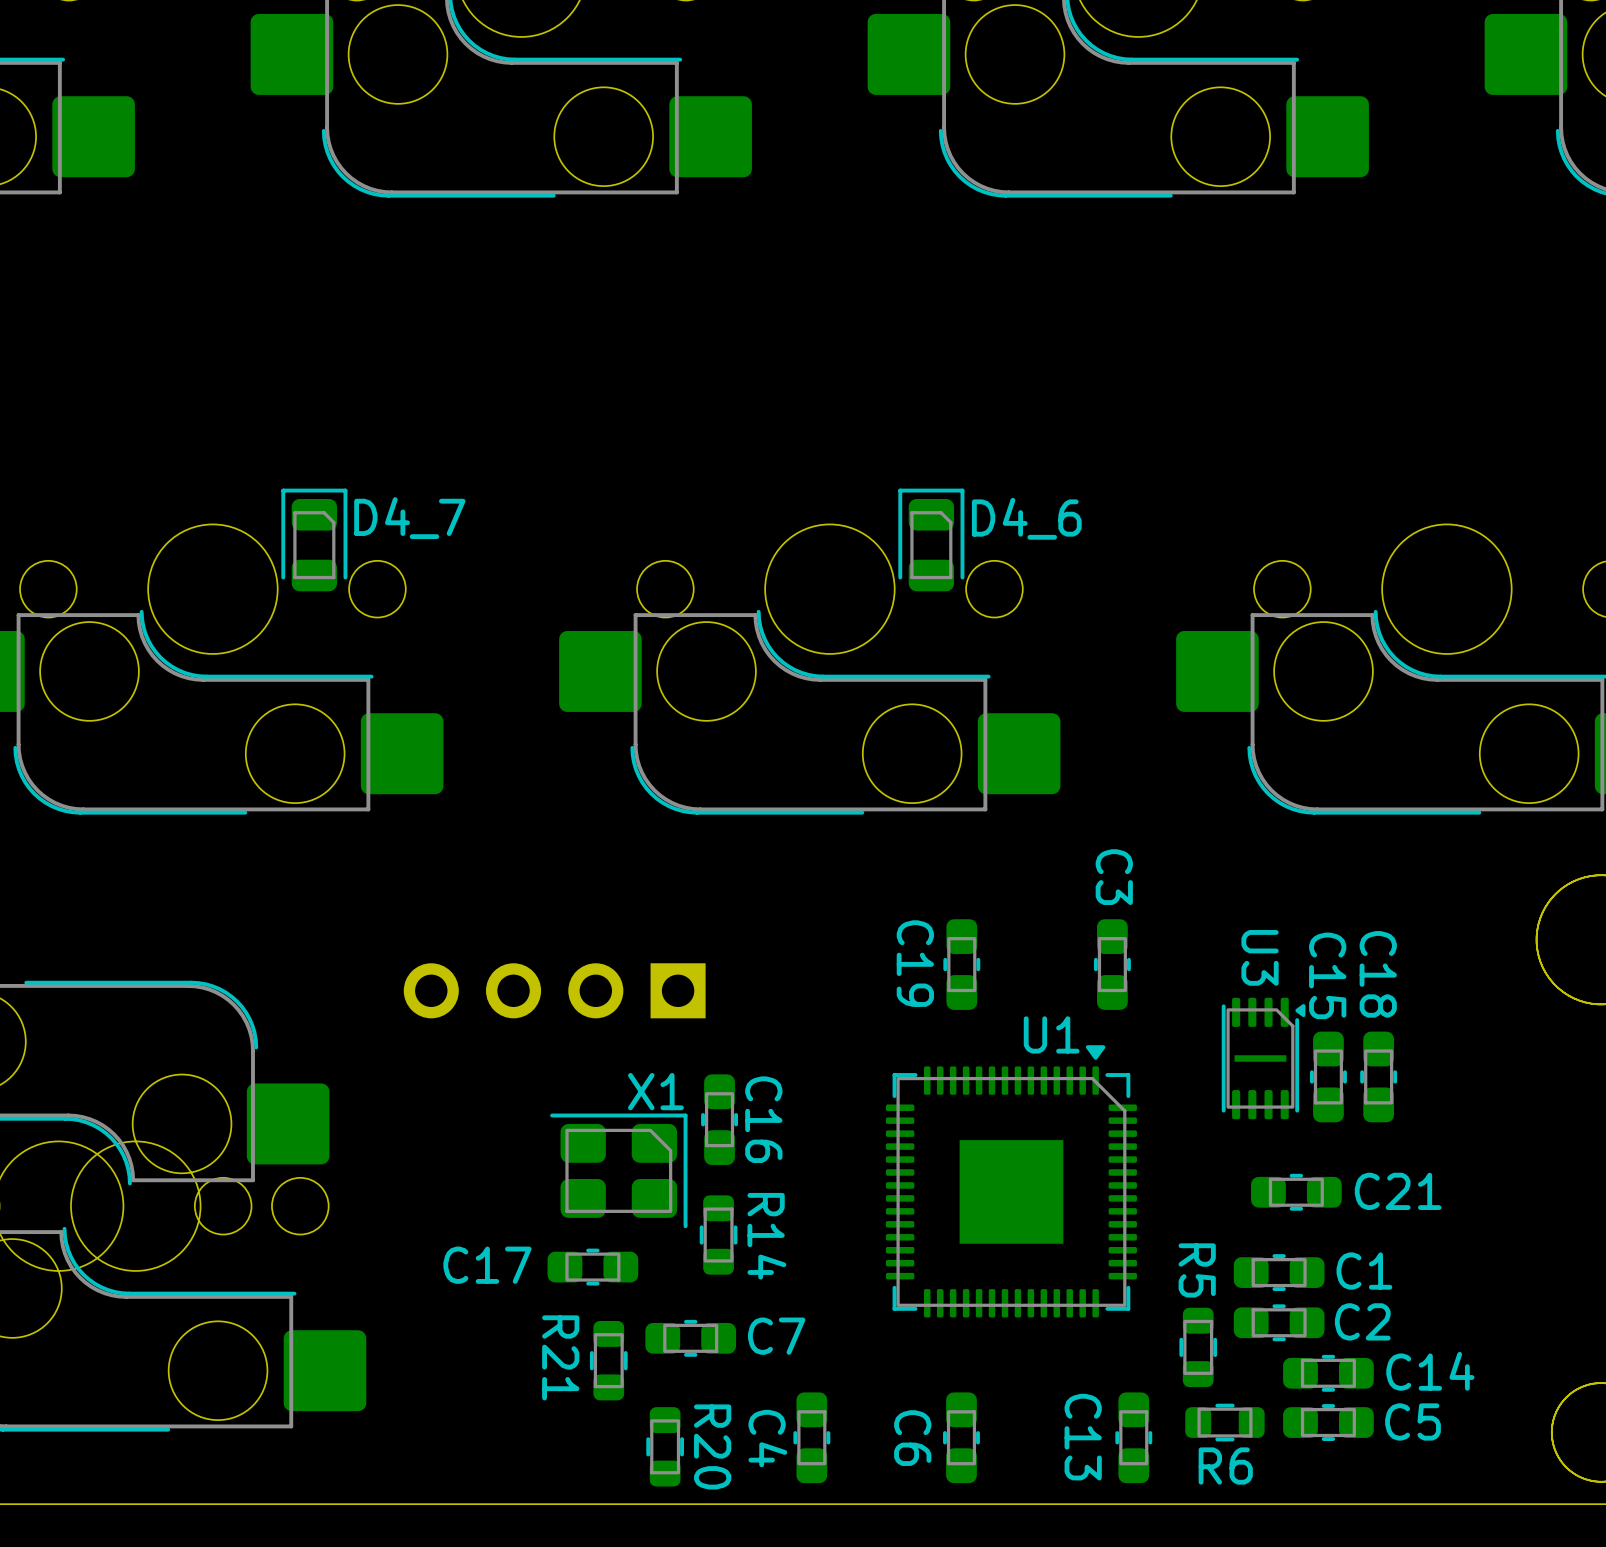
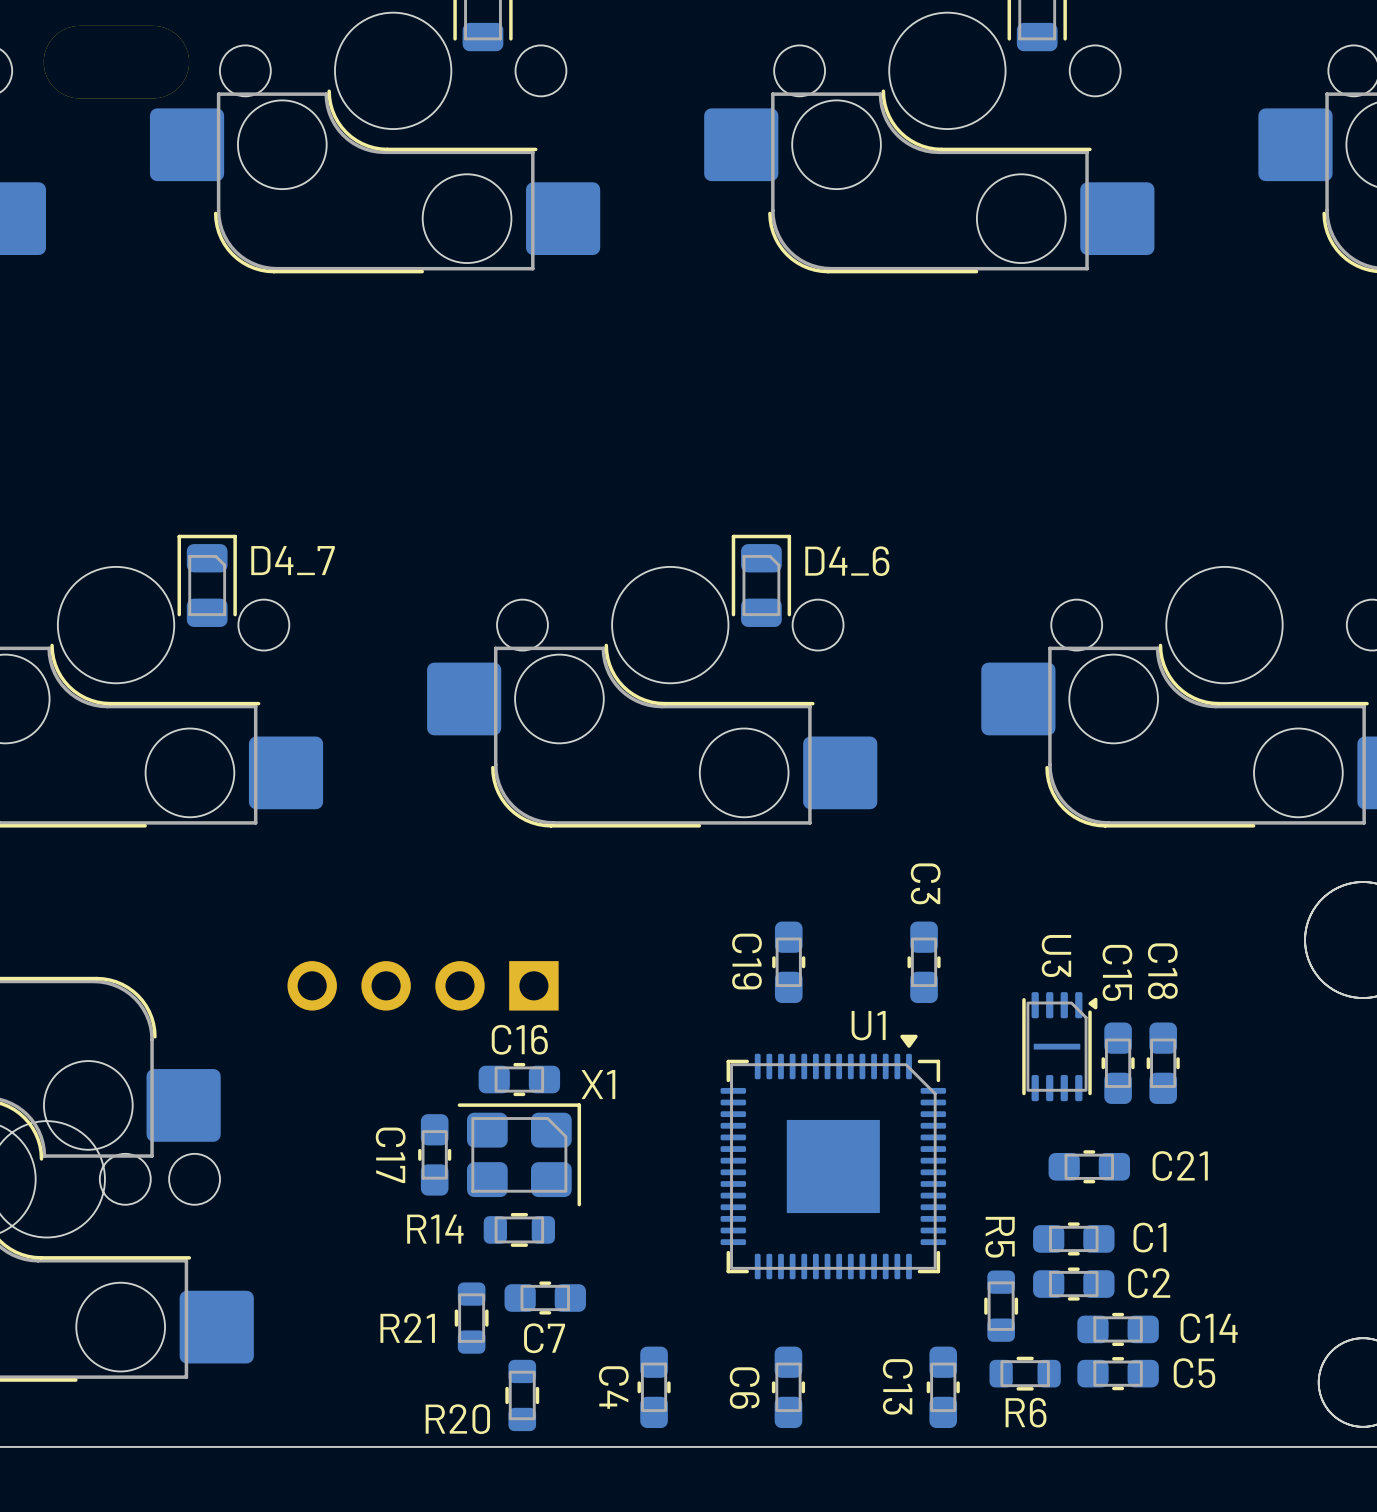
X1 name position: X1 (655, 1091) -> X1 (598, 1084)
C16 rotation: 0° (719, 1119) -> 90° clockwise (519, 1079)
C16 position: (719, 1119) -> (519, 1079)
X1 position: (618, 1170) -> (519, 1154)
R14 rotation: 0° (718, 1235) -> 90° clockwise (519, 1229)
R14 position: (718, 1235) -> (519, 1229)
R14 name position: R14 (766, 1236) -> R14 (435, 1229)
C17 rotation: 0° (592, 1267) -> 90° clockwise (434, 1154)
C17 position: (592, 1267) -> (434, 1154)
C7 name position: C7 (776, 1336) -> C7 (544, 1338)
R21 name rotation: 0° (560, 1357) -> 90° counterclockwise (407, 1328)
R20 name rotation: 0° (712, 1446) -> 90° counterclockwise (457, 1419)
R20 name position: R20 (712, 1446) -> R20 (457, 1419)

